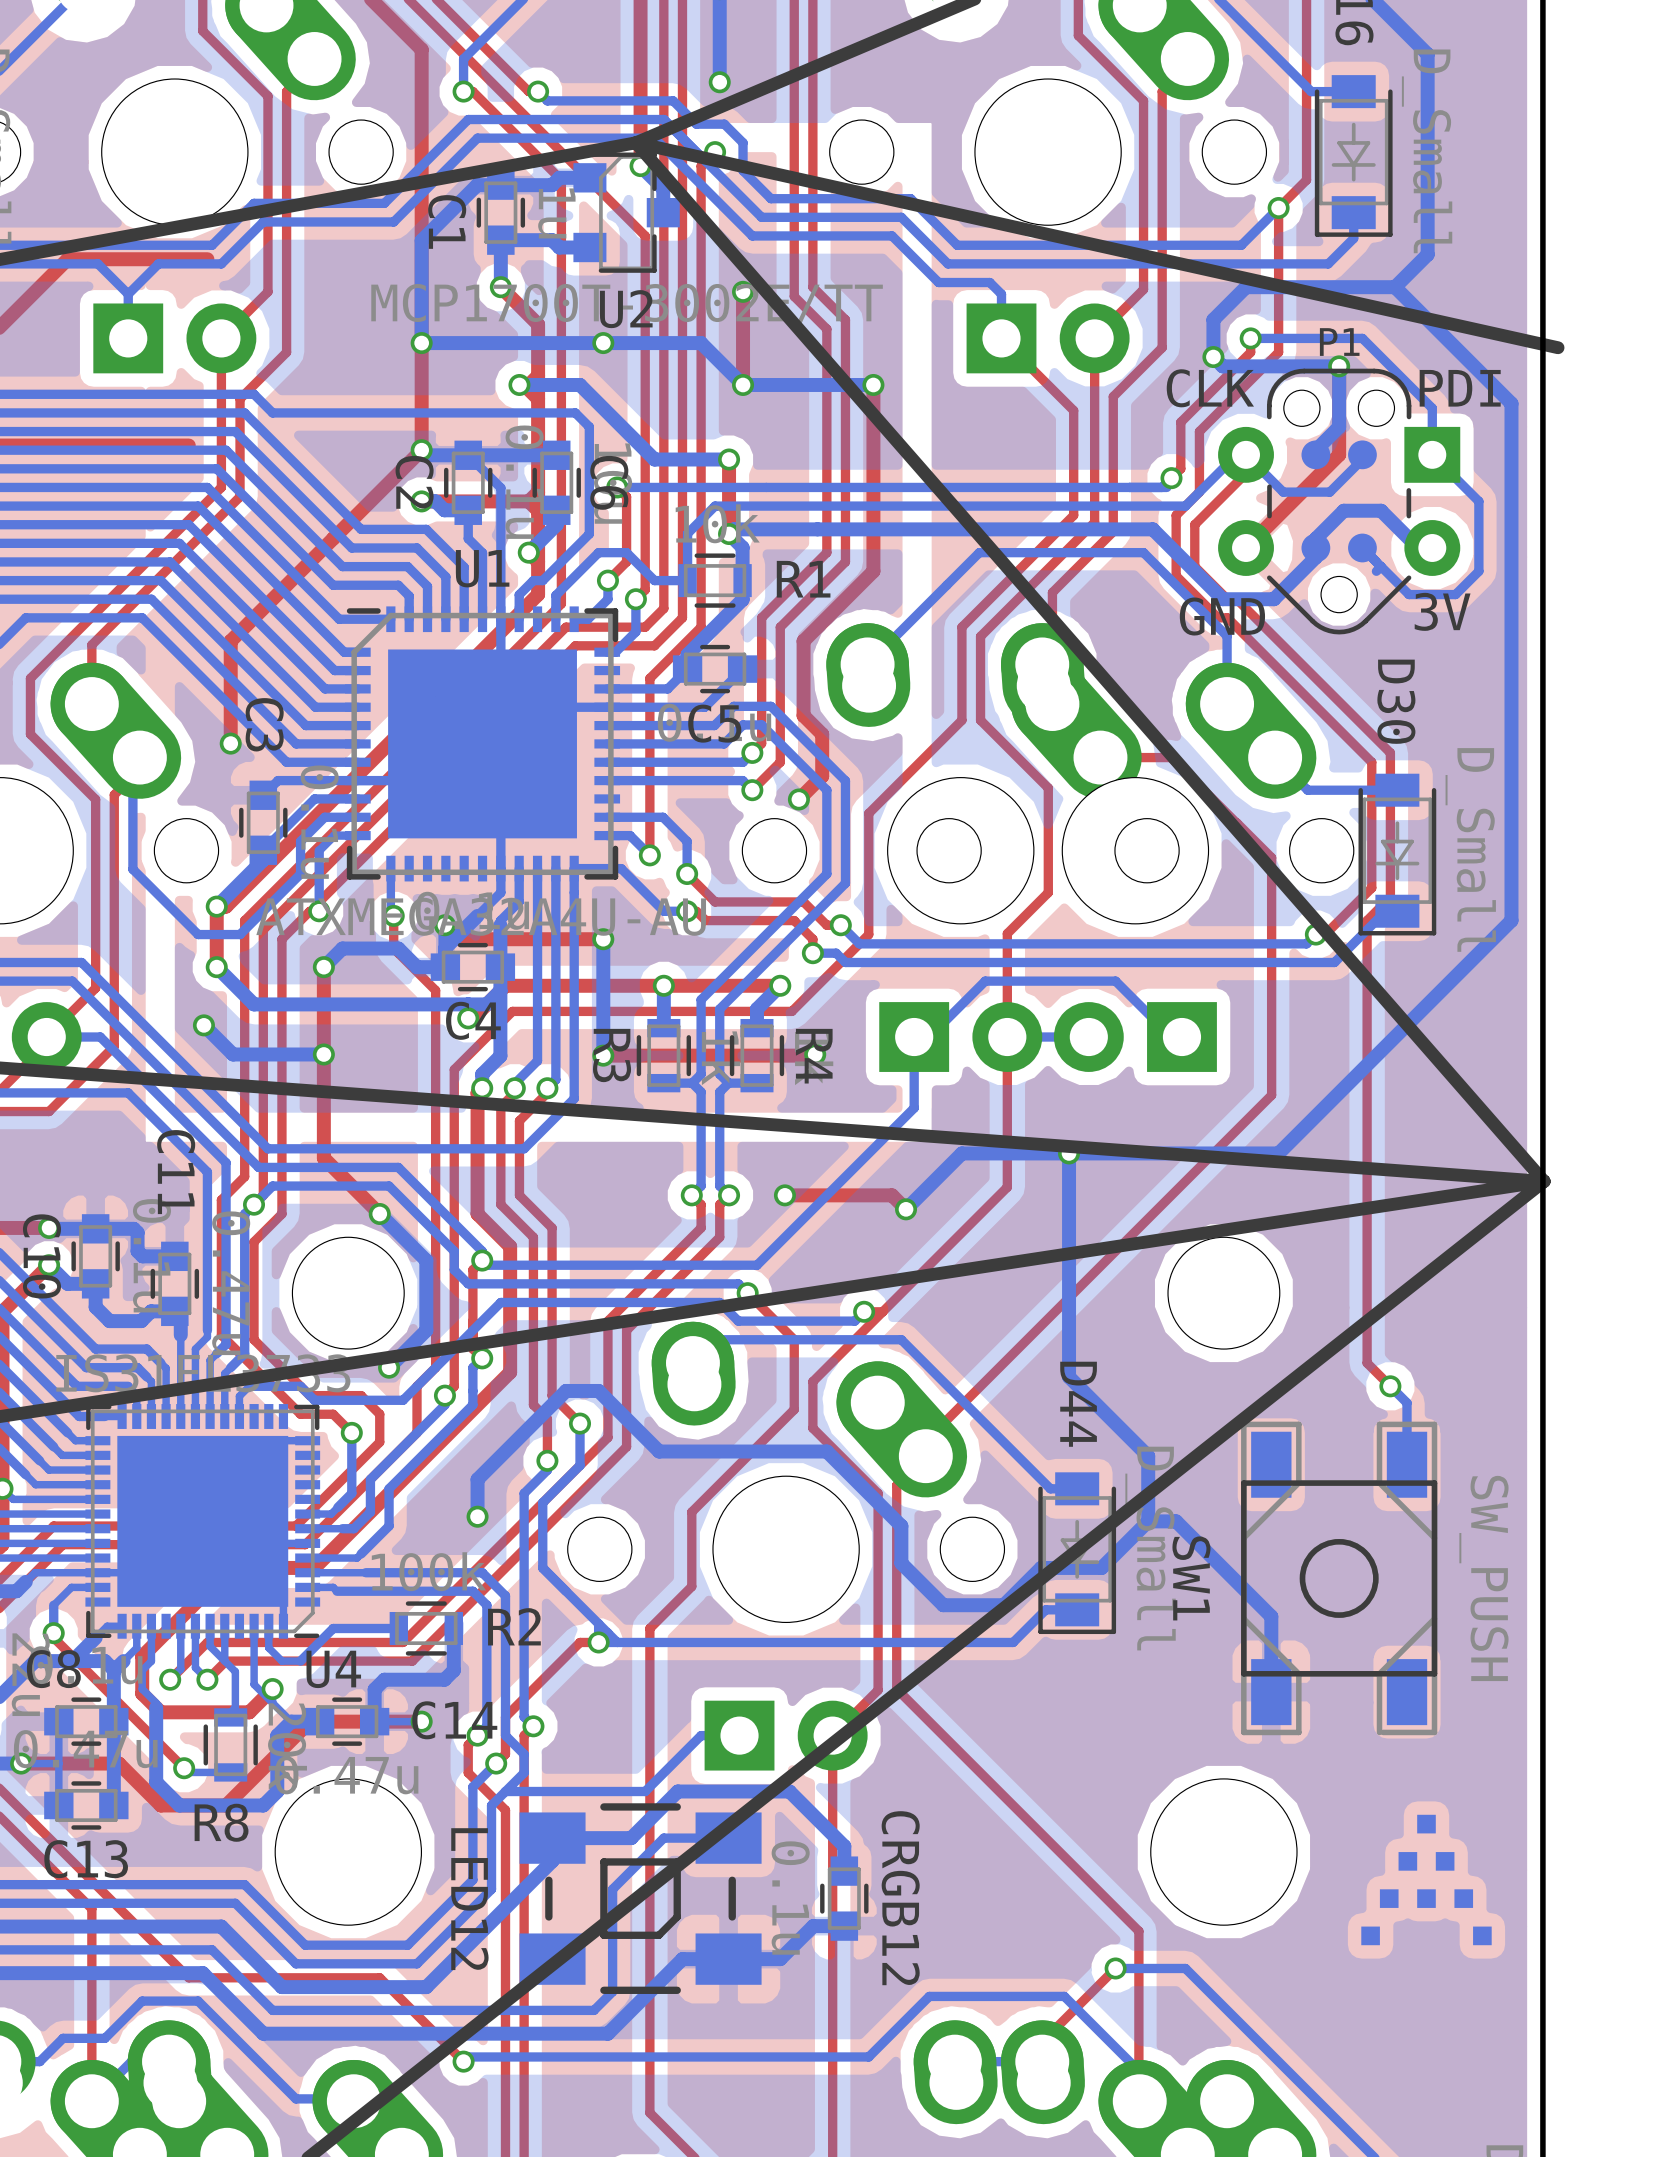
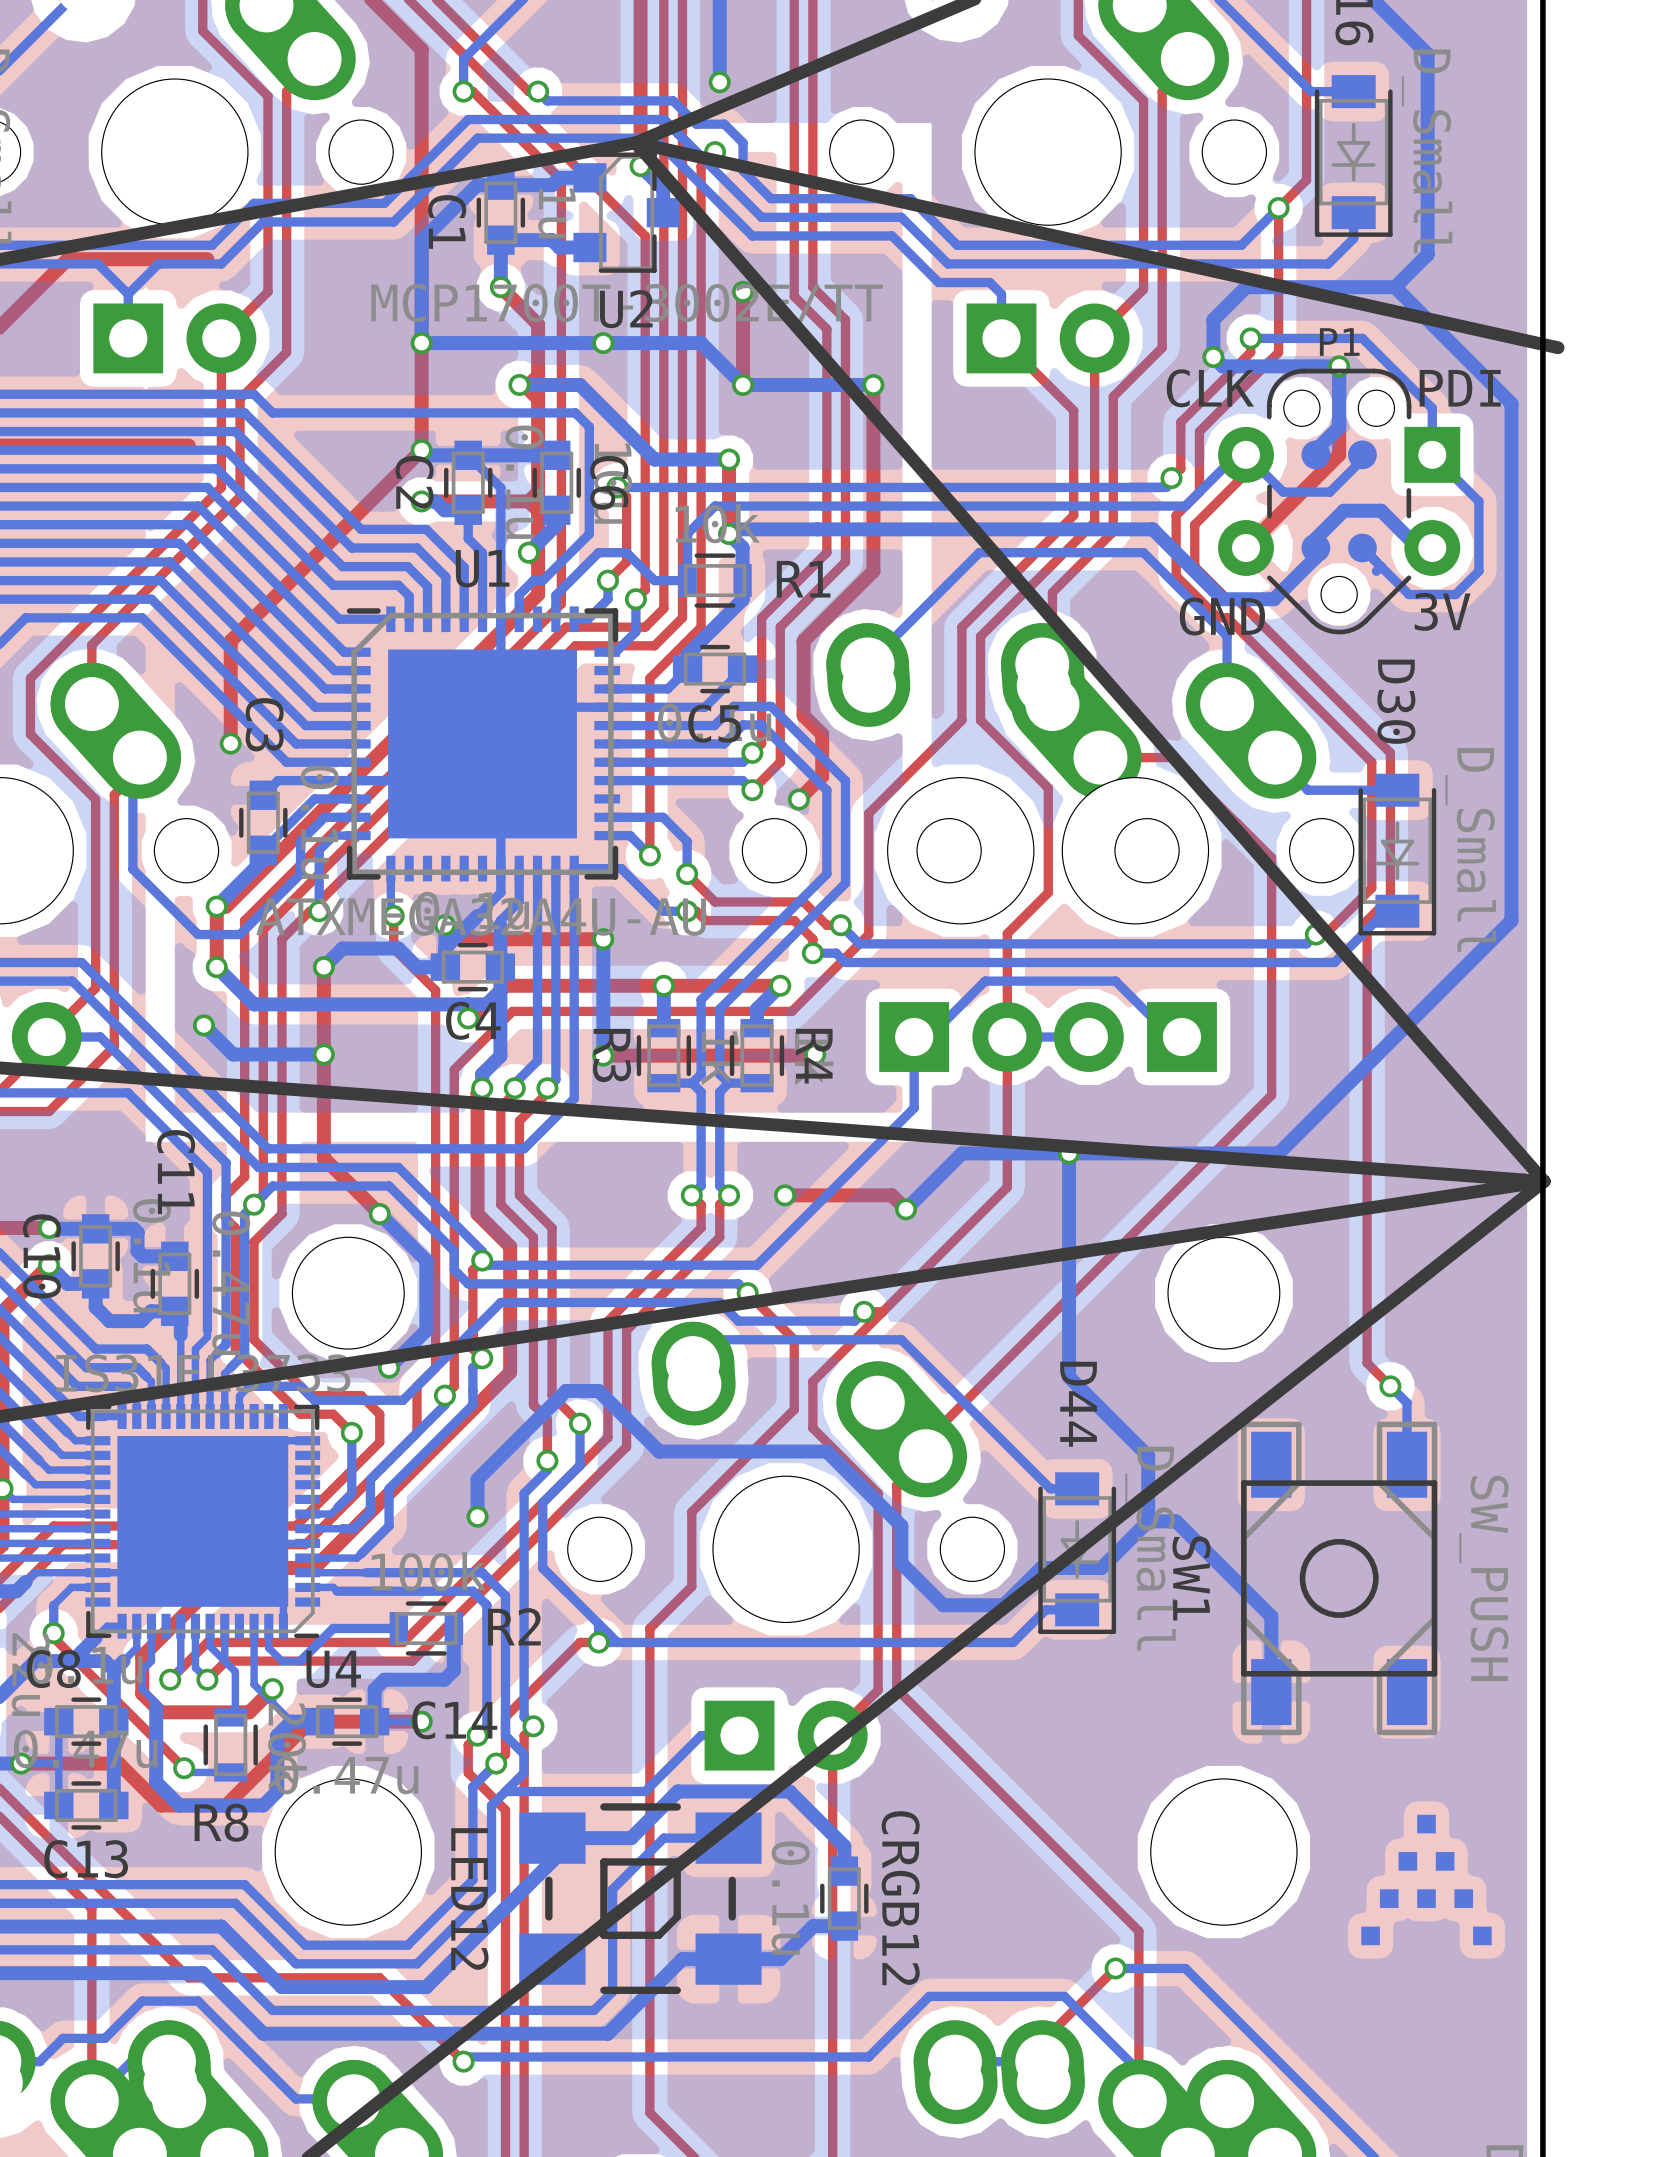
top track: (226, 1195) (221, 1200) (221, 1335) (235, 1349) -> (226, 1195) (226, 1218) (235, 1227) (235, 1349)

